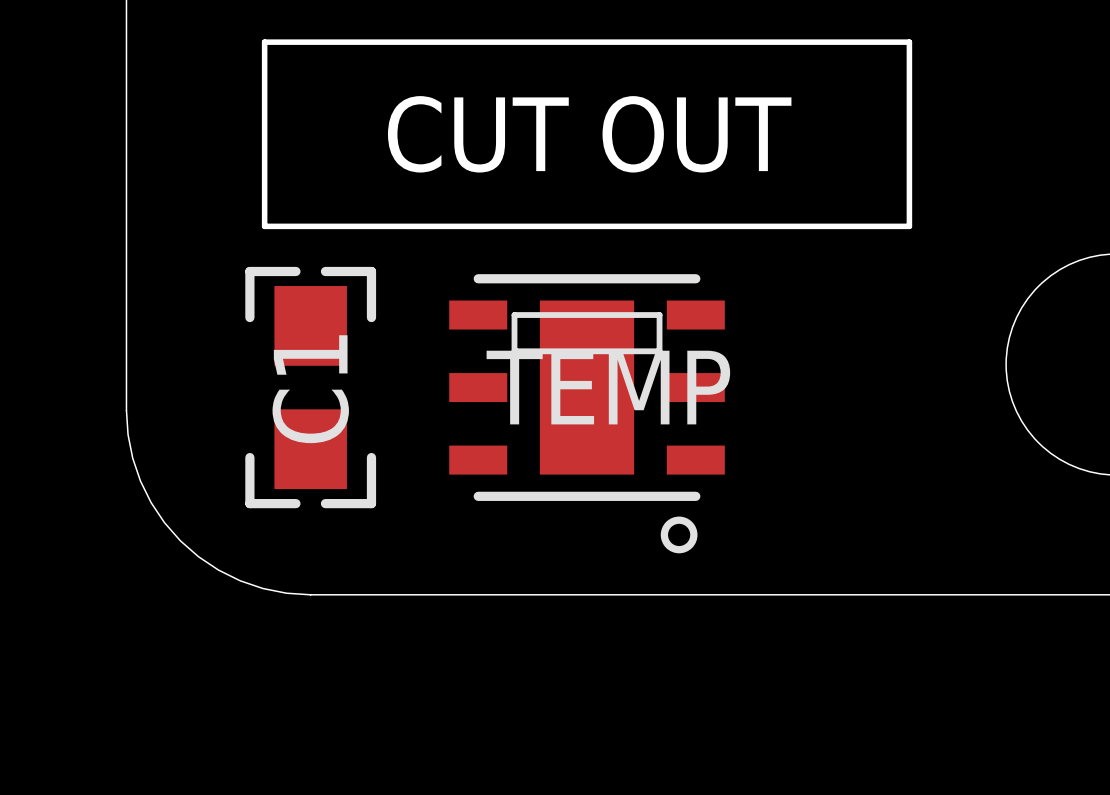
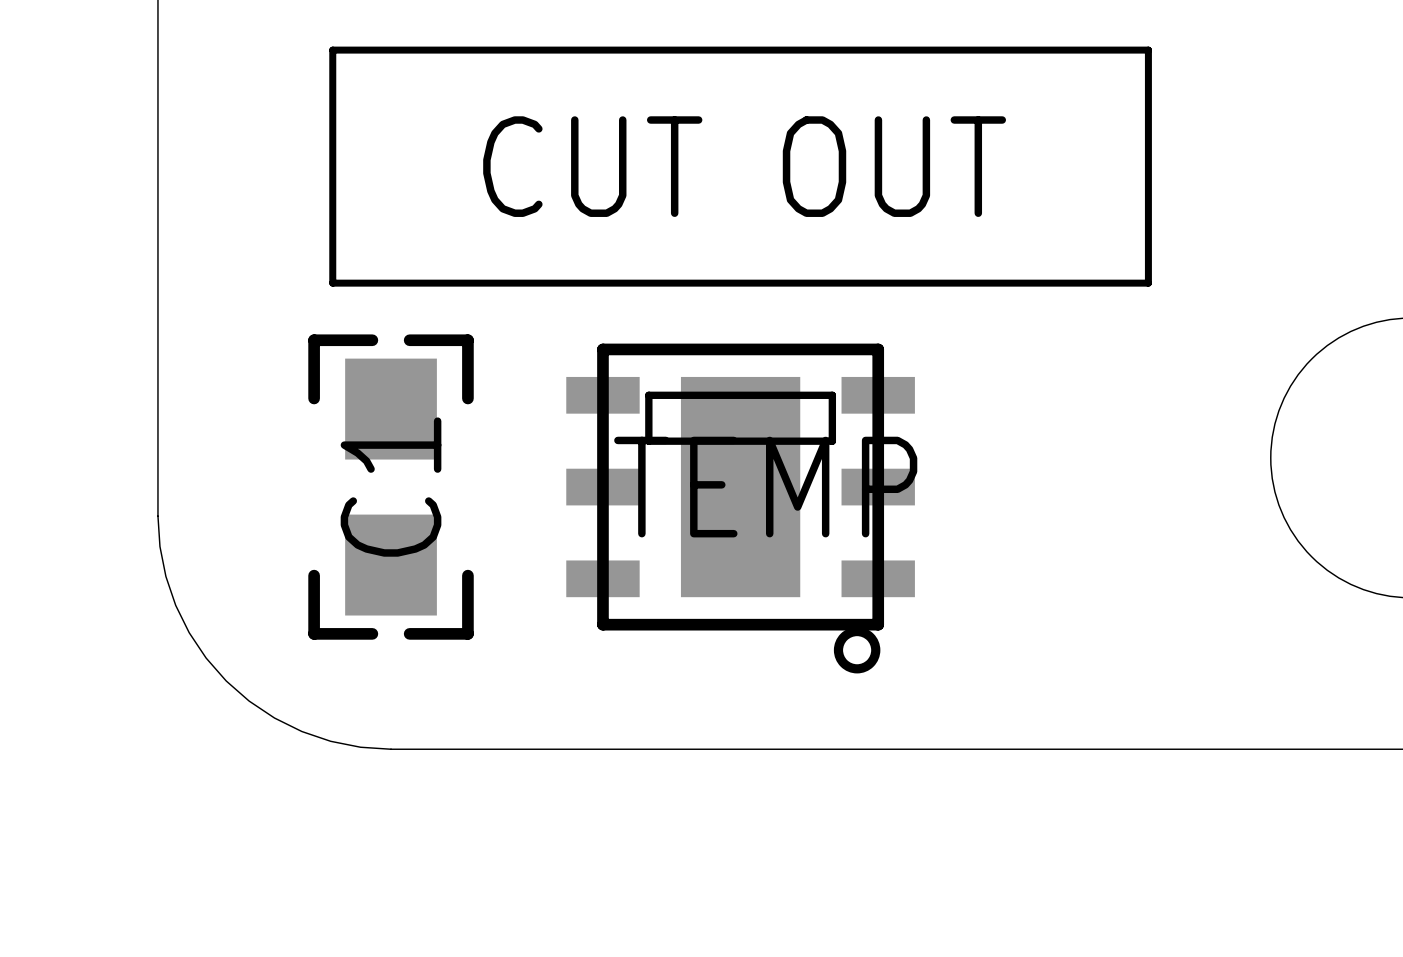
TEMP footprint: [449, 274, 725, 554] -> [566, 343, 915, 674]

